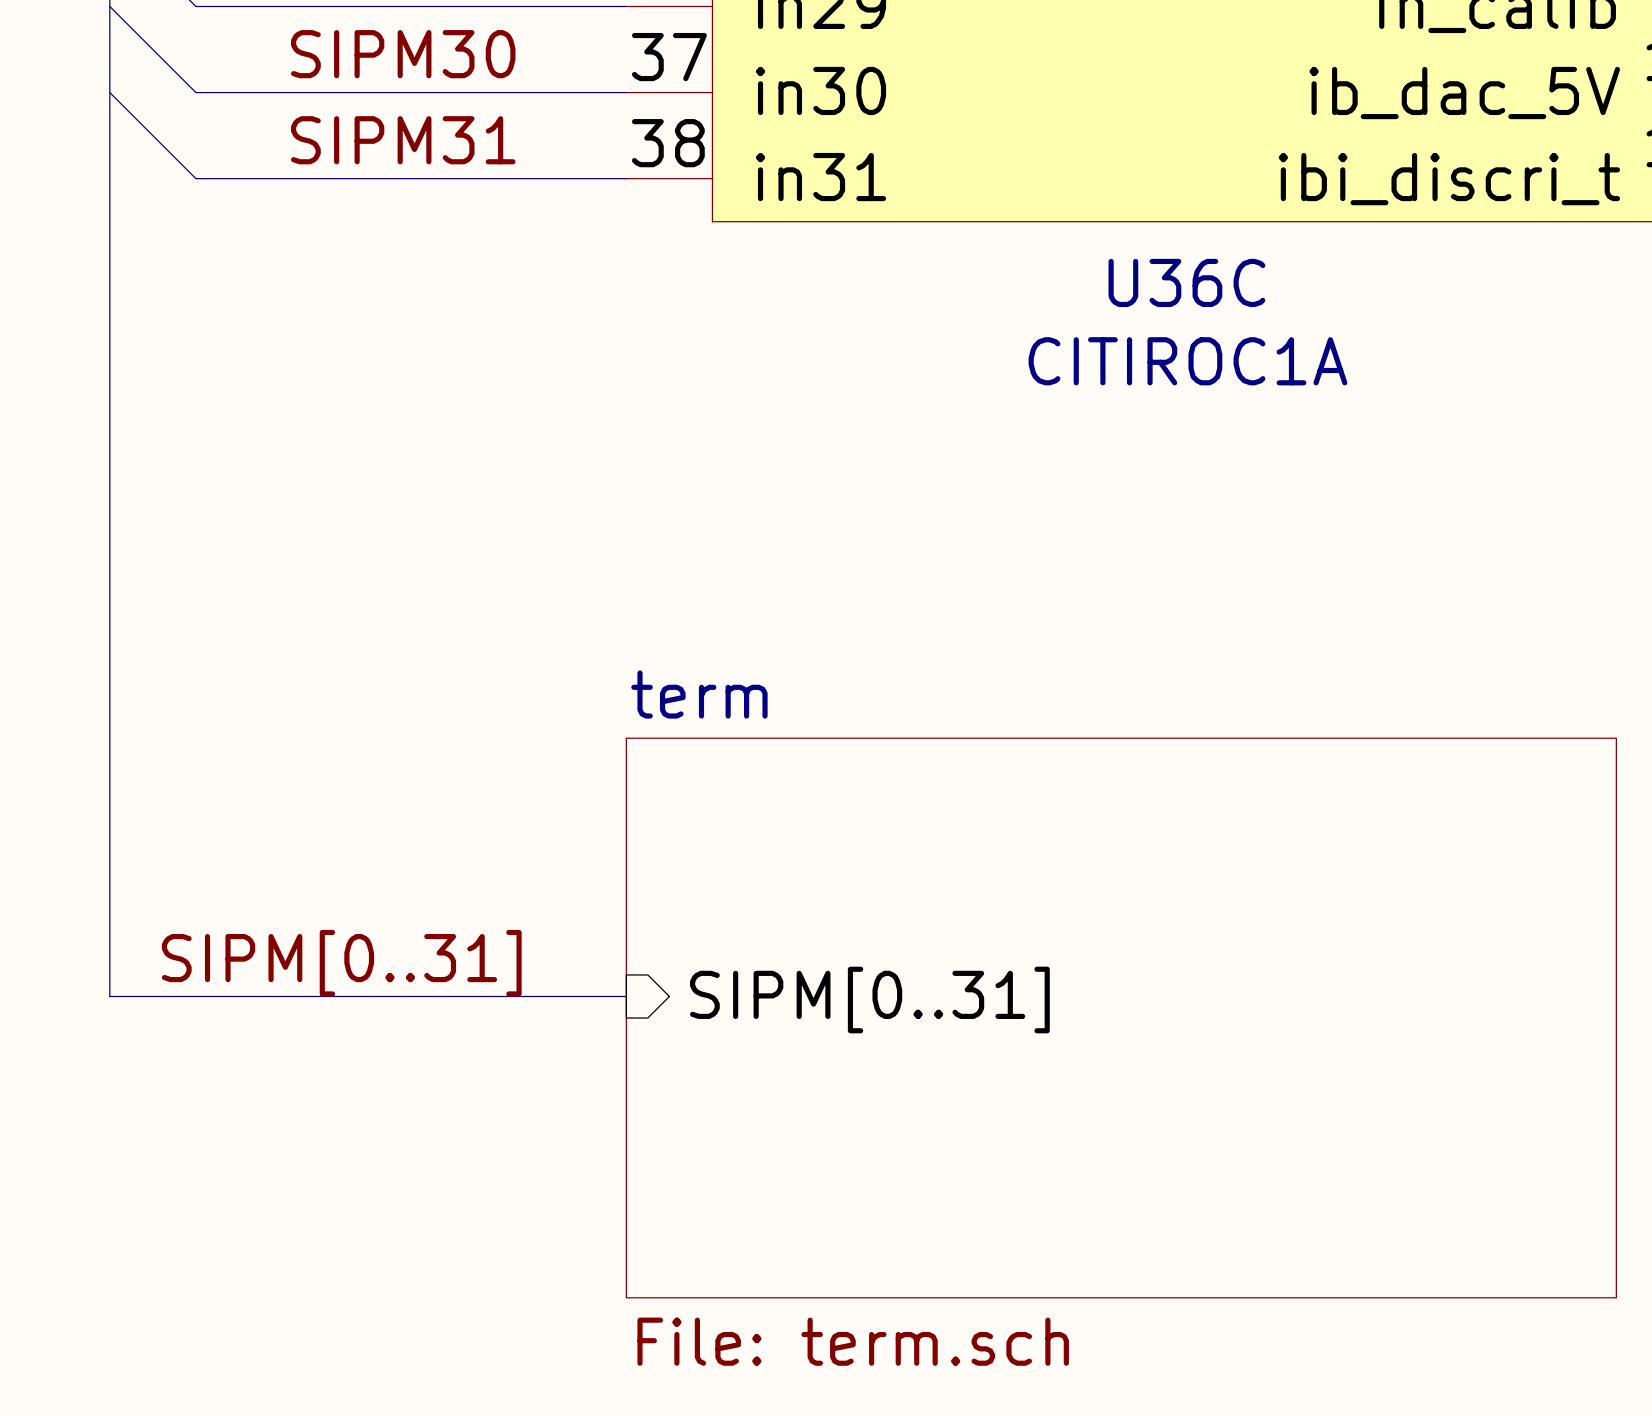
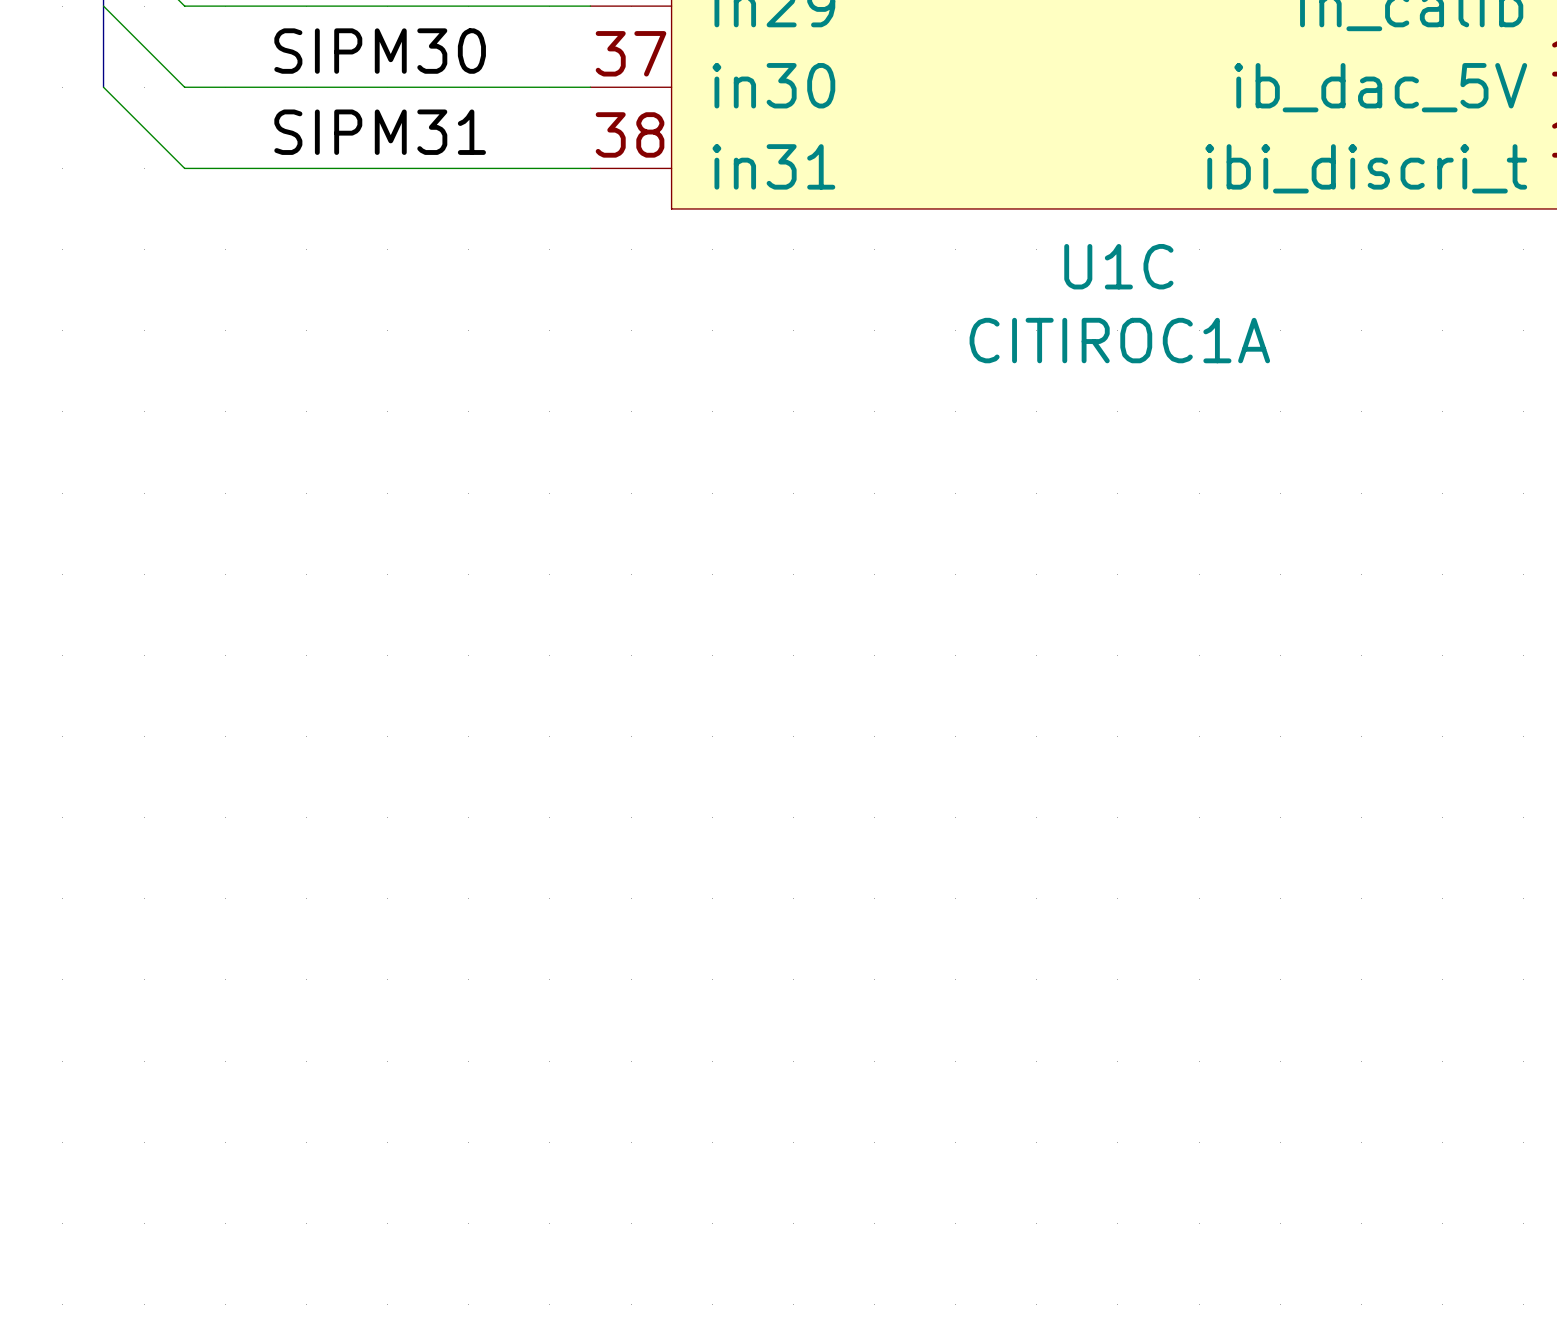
bus: (109, 92) (109, 996) (626, 996) -> none
U36C name: U36C (1186, 282) -> U1C (1118, 266)
label: SIPM[0..31] (341, 963) -> none
sheet pin: SIPM[0..31] (869, 1000) -> none
sheet term: File: term.sch (1121, 1018) -> none

